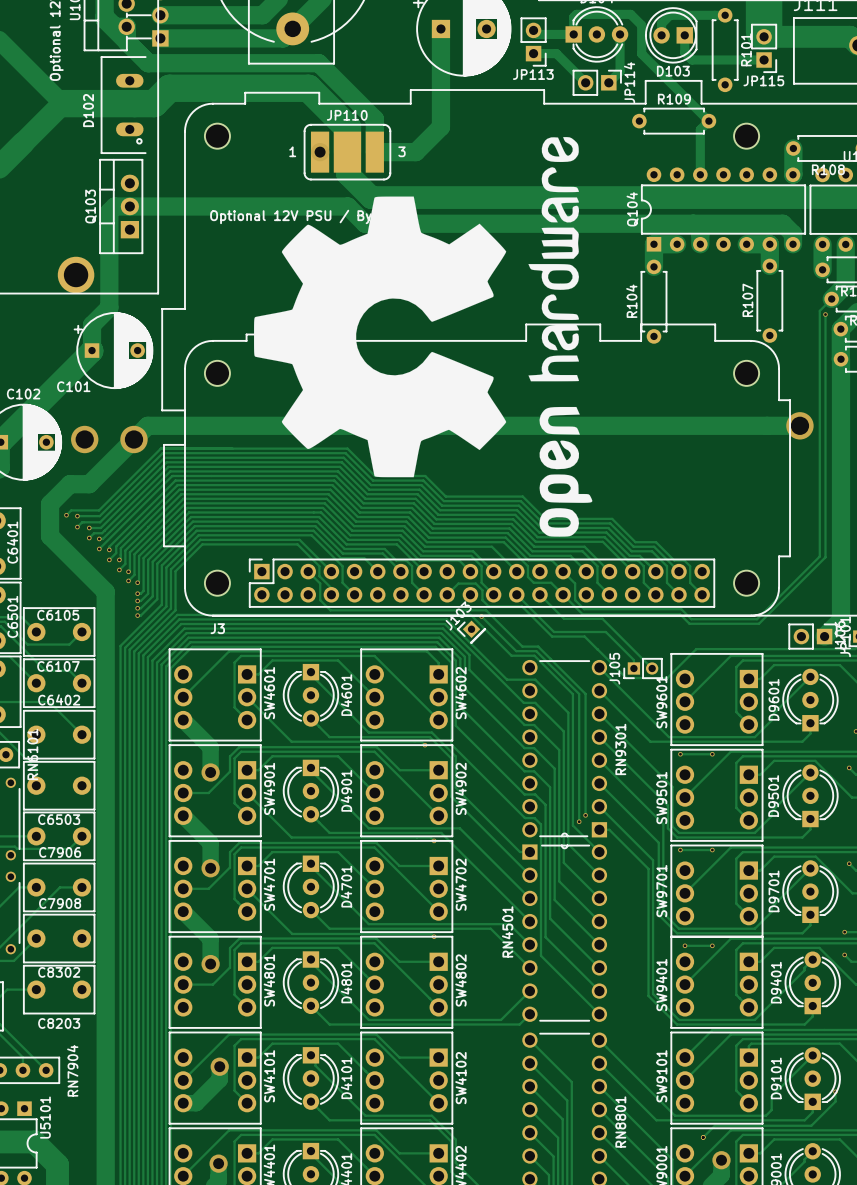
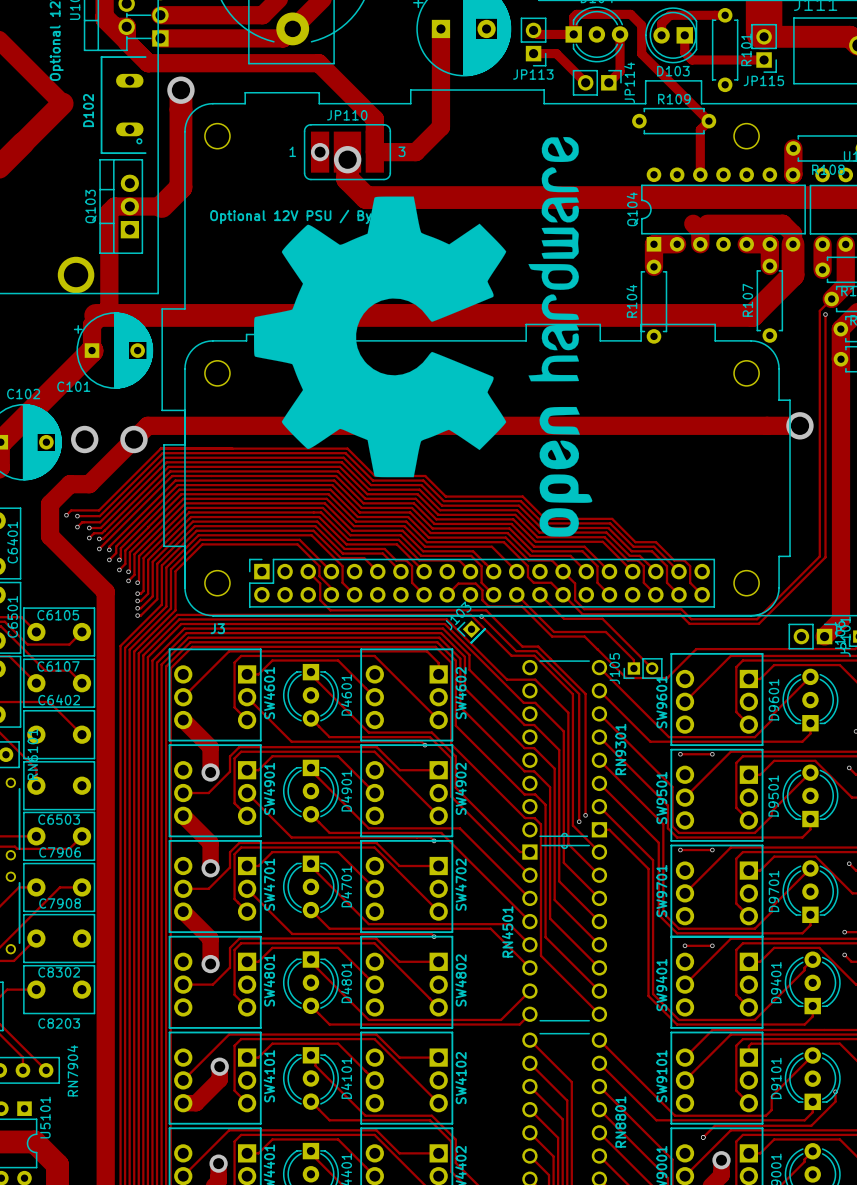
via: none -> (180, 90)
track: (62, 103) (154, 103) (169, 88) (308, 88) (347, 127) (347, 173) (371, 197) -> (347, 159) (347, 179) (366, 197) (371, 197)
via: none -> (347, 159)
track: (161, 206) (347, 206) (365, 223) (707, 223) -> (161, 206) (180, 187) (180, 90)
track: none -> (793, 244) (793, 275) (752, 315) (95, 315)

